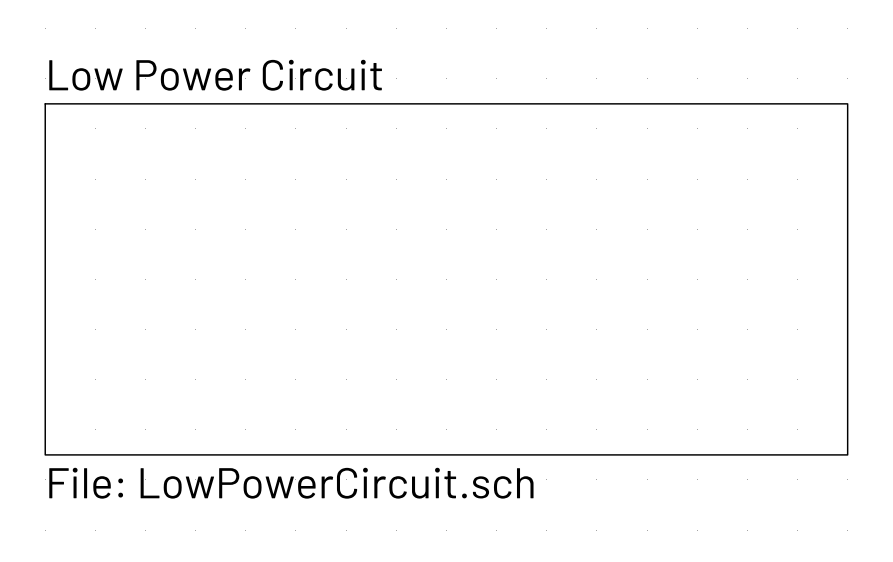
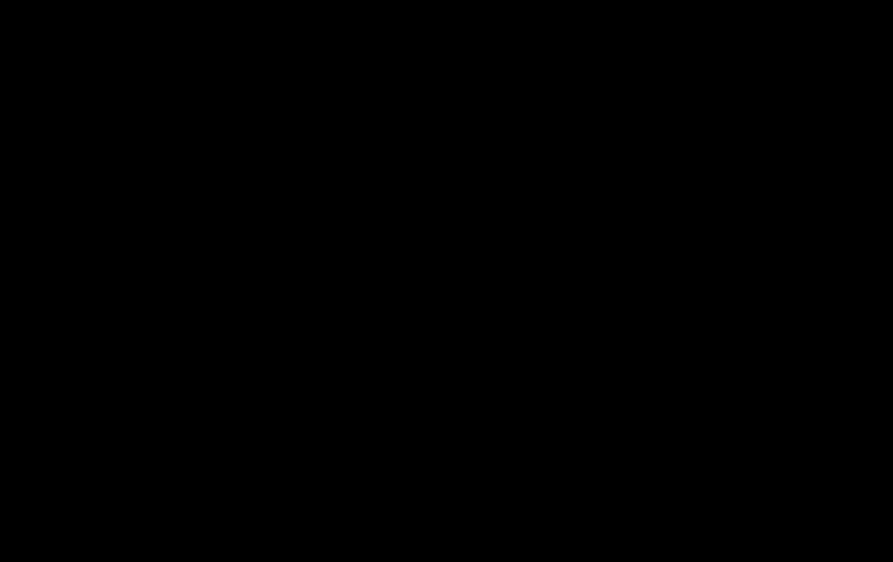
sheet Low Power Circuit: File: LowPowerCircuit.sch (446, 279) -> none

